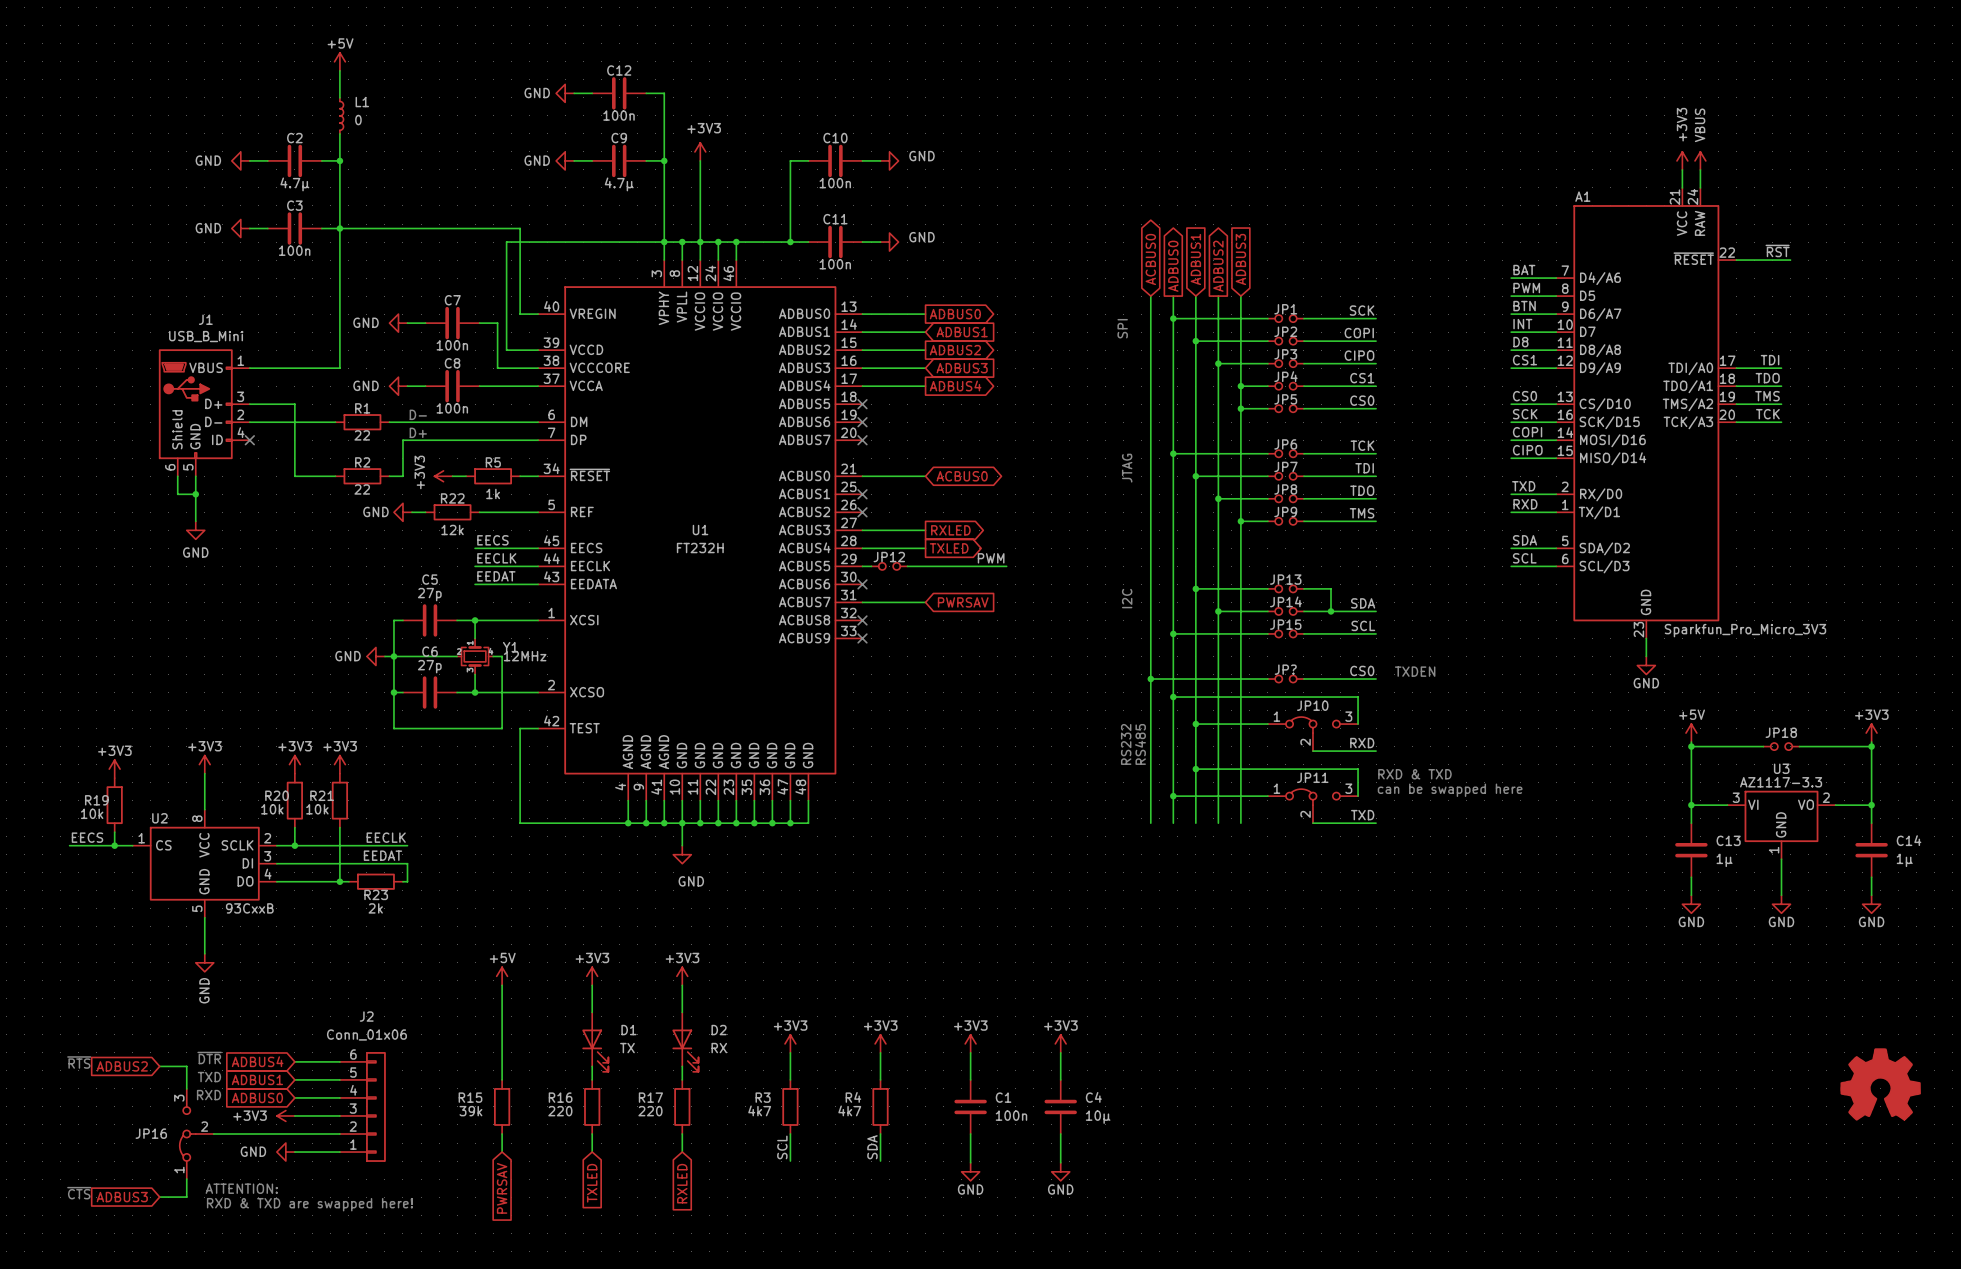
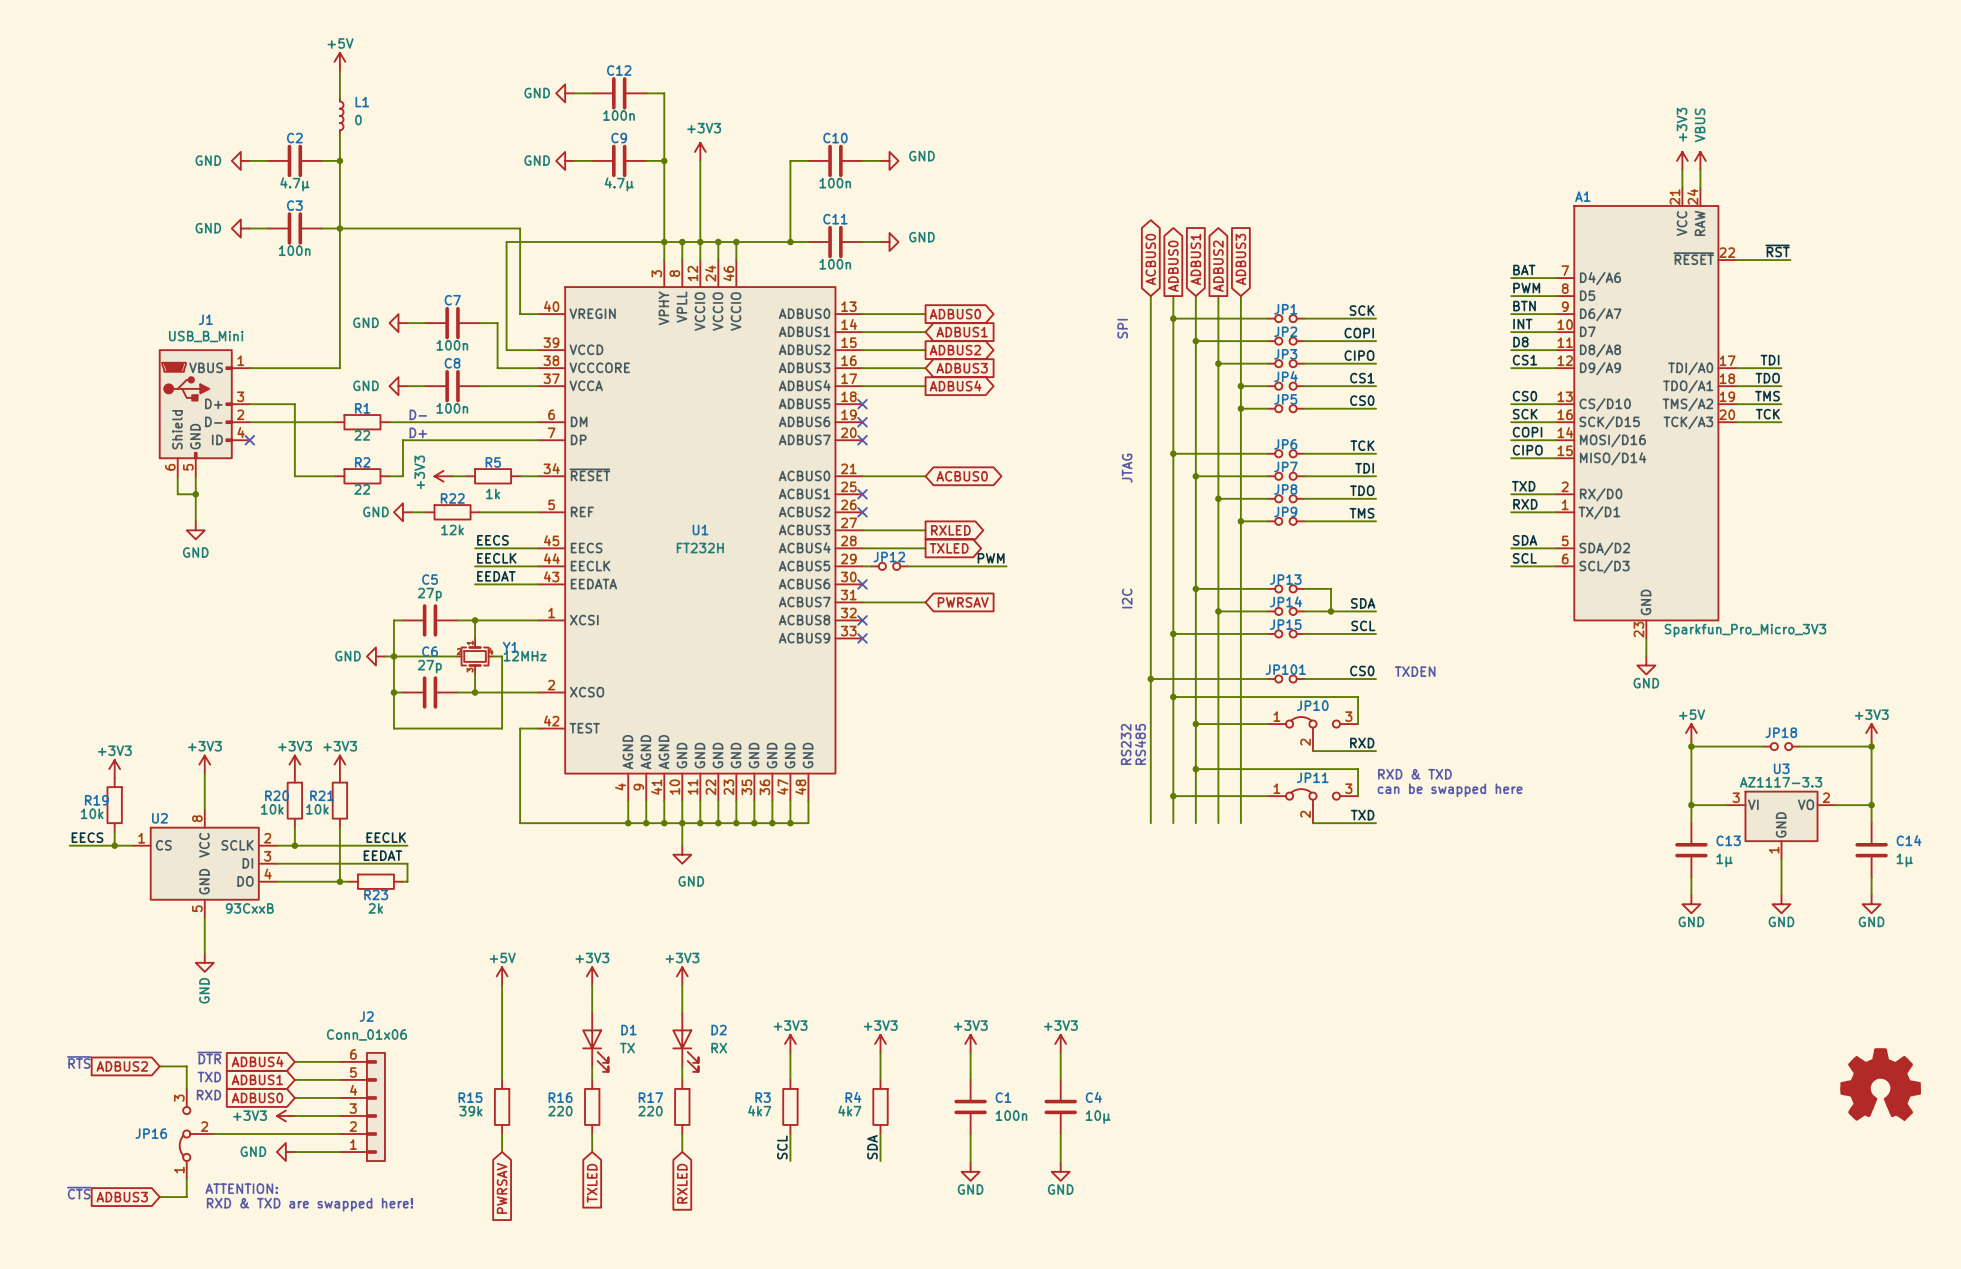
JP? name: JP? (1285, 669) -> JP101 (1285, 669)

